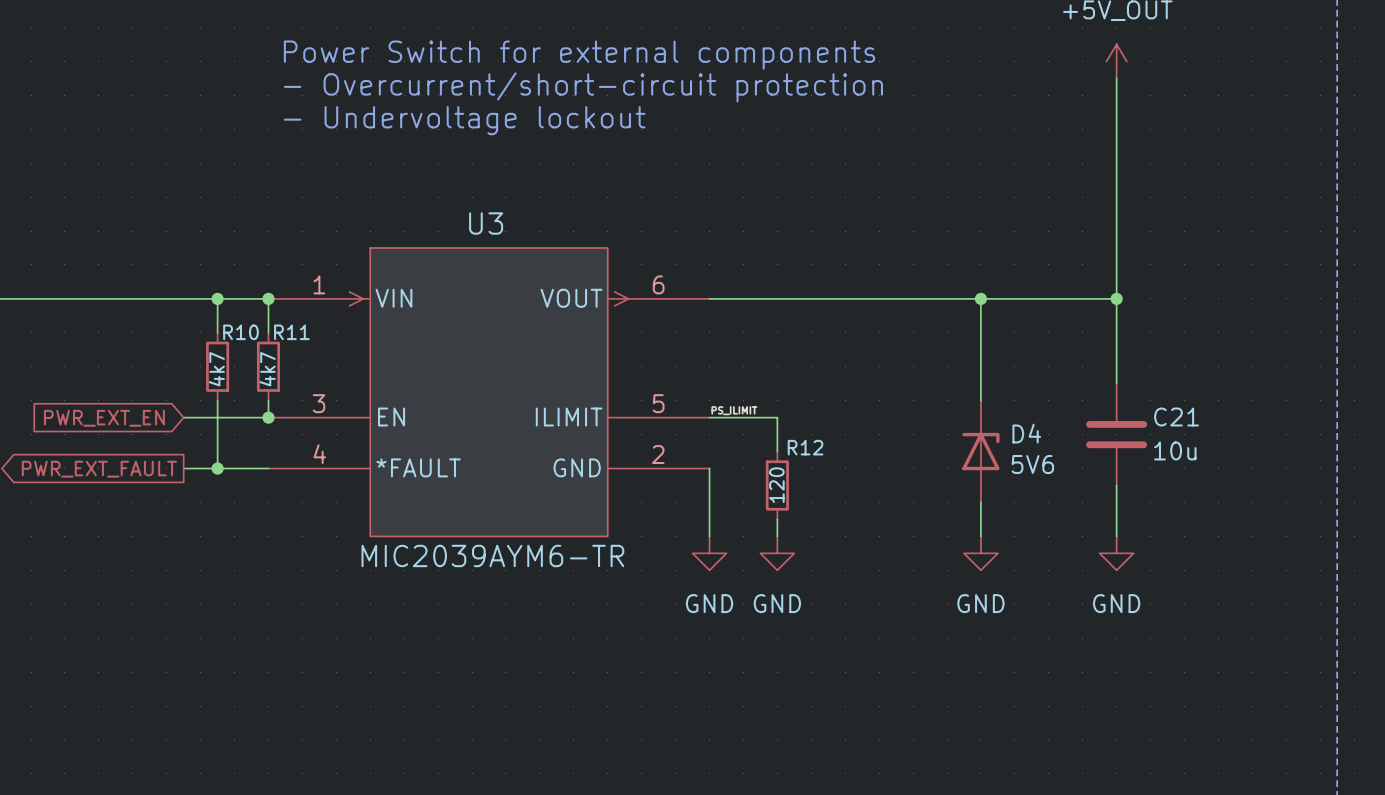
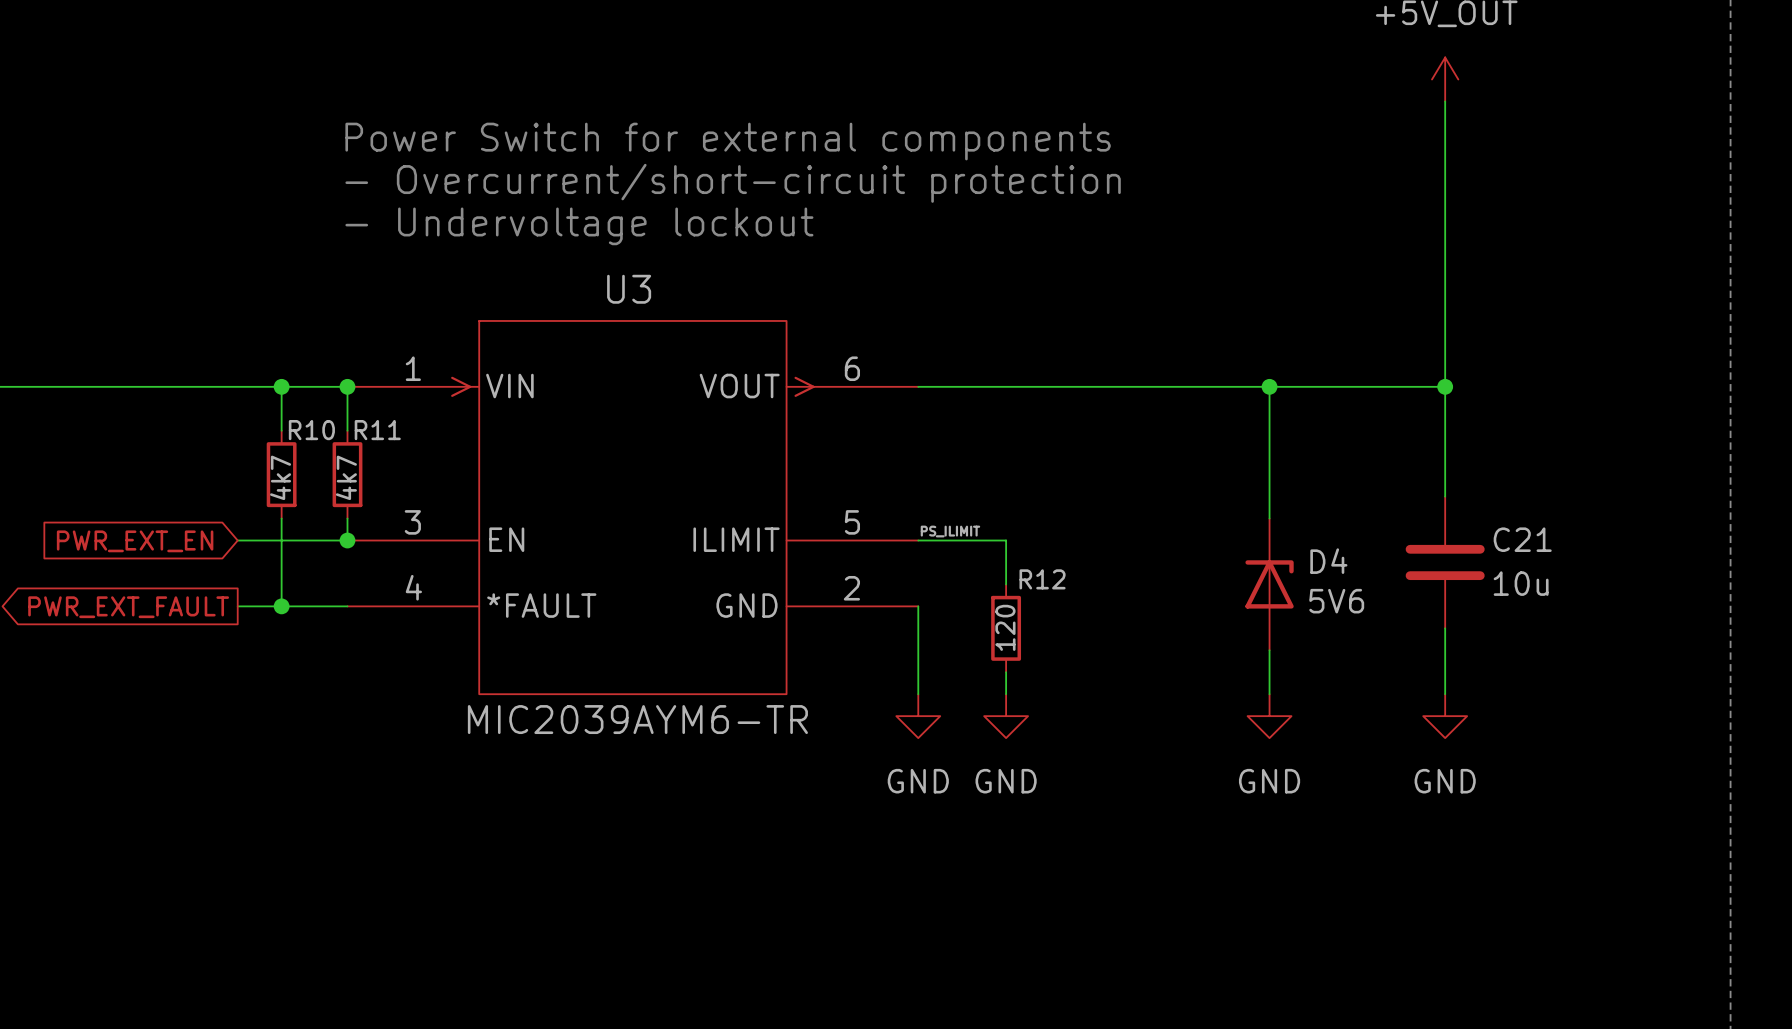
text position: Power Switch for external components (579, 55) -> Power Switch for external components (728, 141)
text position: - Overcurrent/short-circuit protection (583, 87) -> - Overcurrent/short-circuit protection (733, 183)
text position: - Undervoltage lockout (464, 120) -> - Undervoltage lockout (579, 226)

